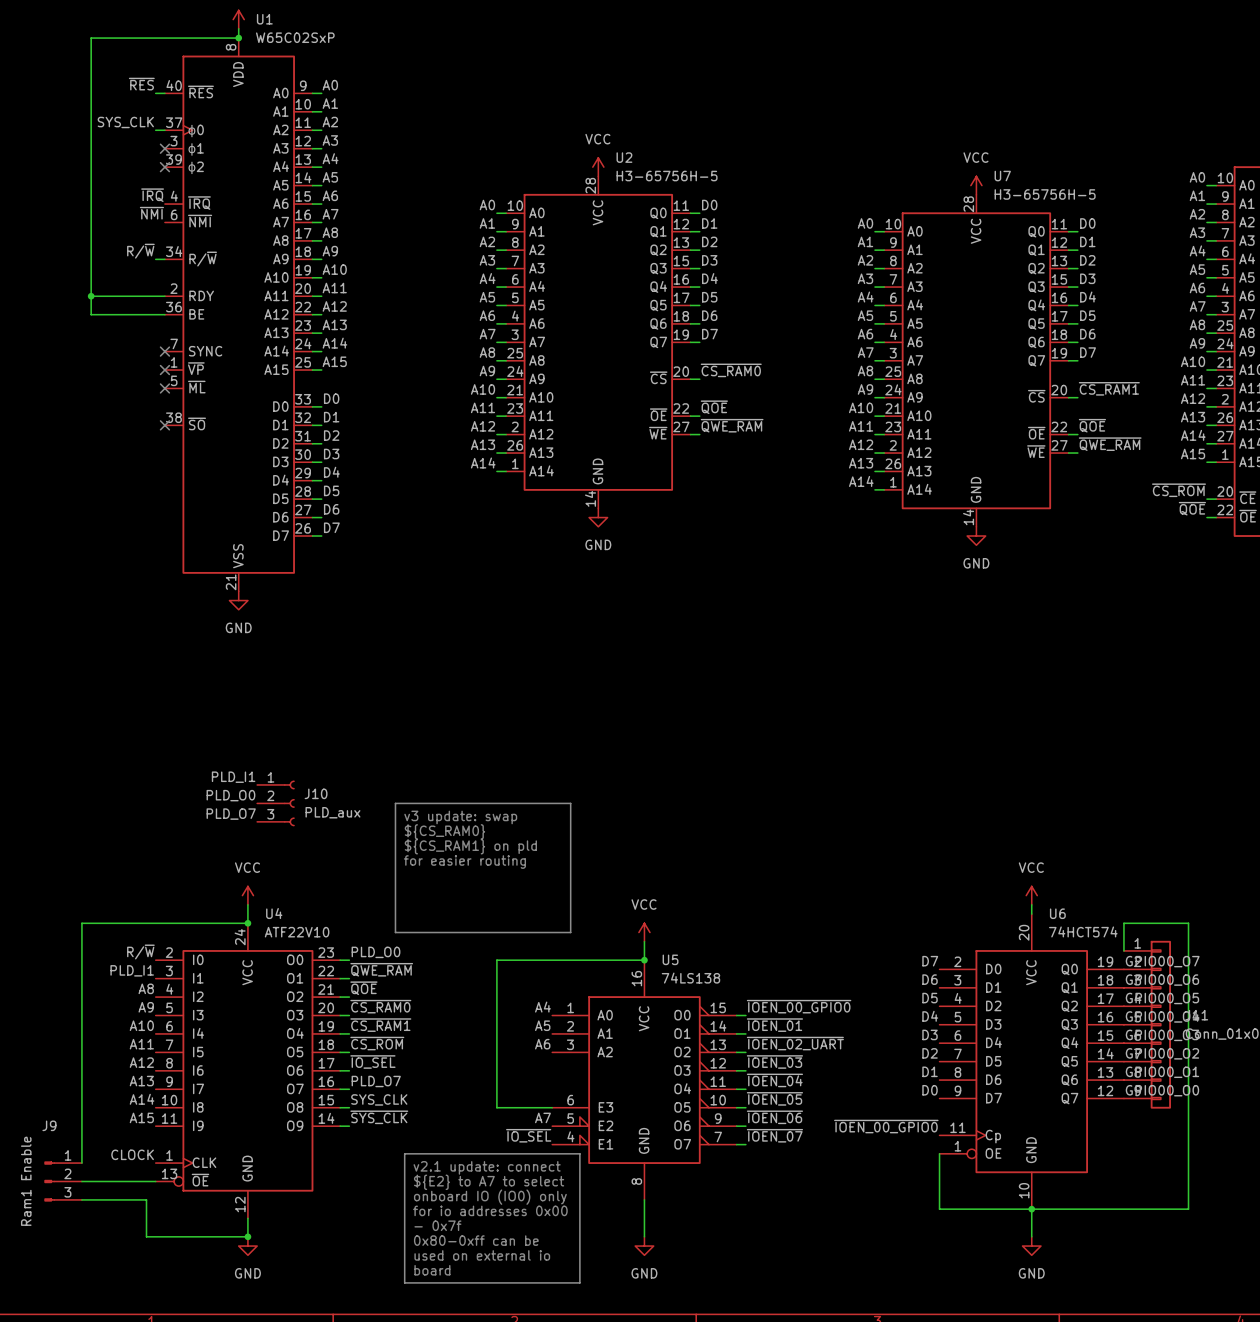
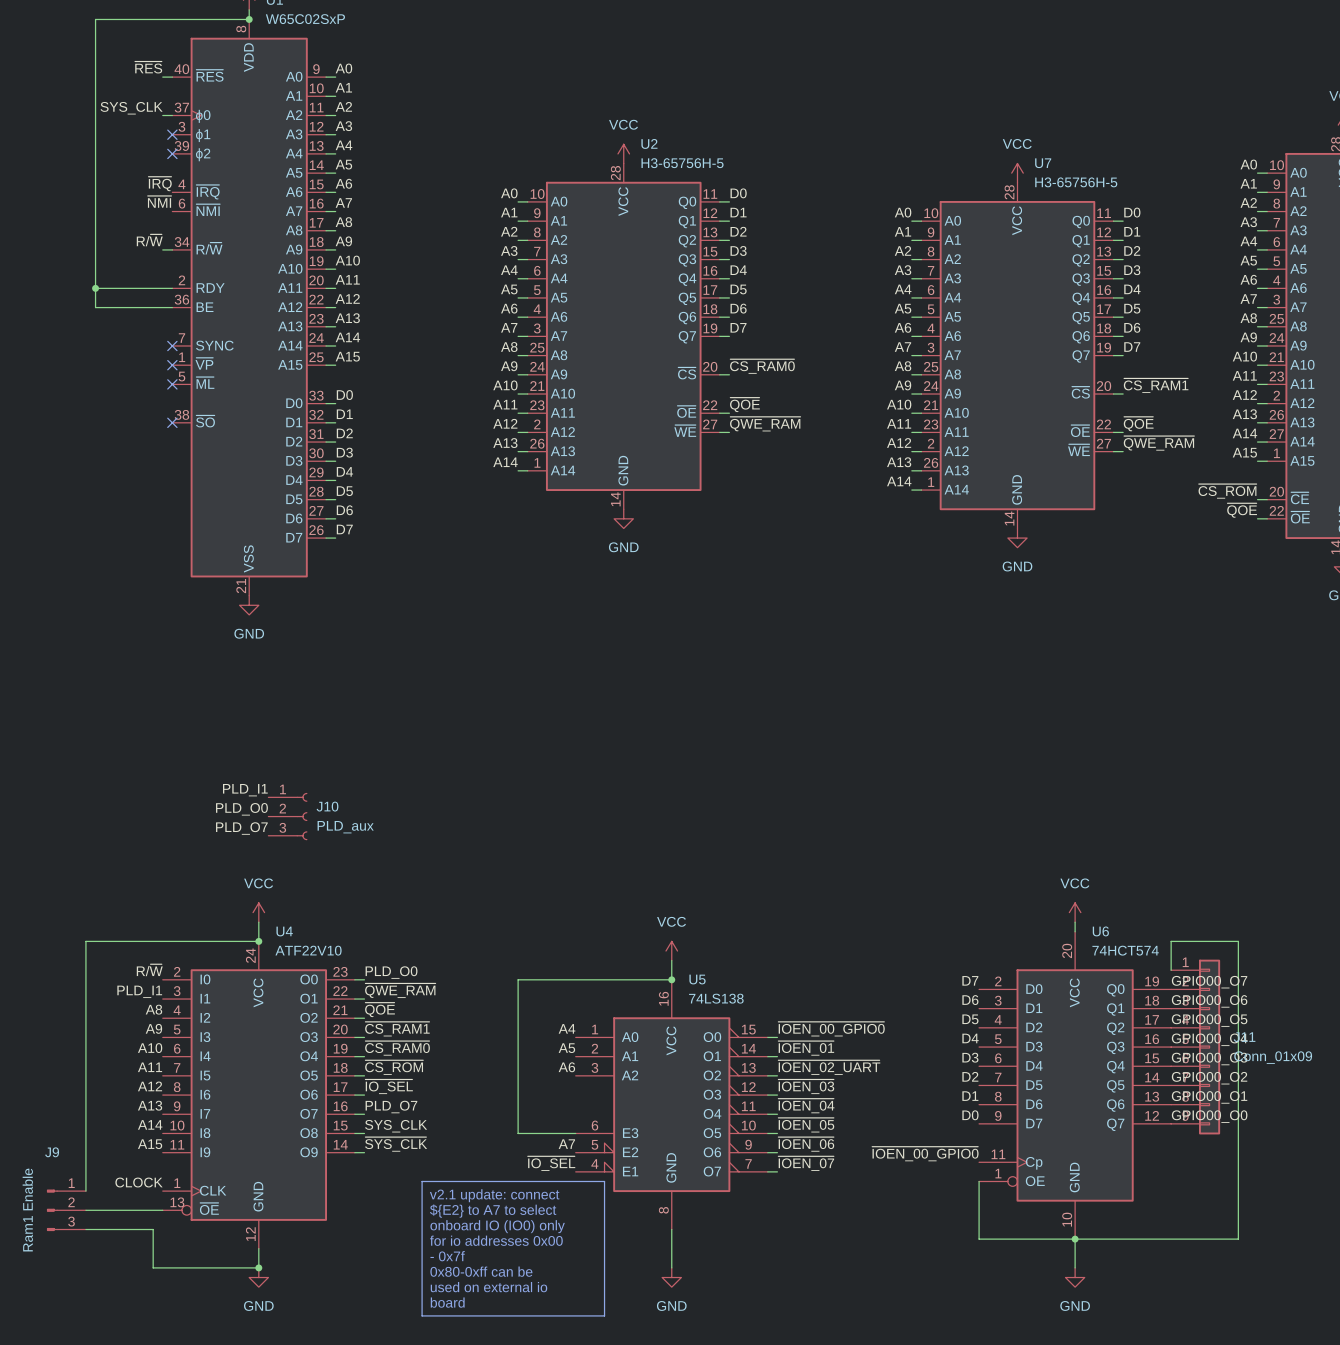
line: (395, 803) (570, 803) (570, 932) (395, 932) (395, 803) -> none
text: v3 update: swap (460, 817) -> none
text: ${CS_RAM0} (444, 831) -> none
text: ${CS_RAM1} on pld (470, 846) -> none
text: for easier routing (464, 862) -> none
label: ~{CS_RAM0} (380, 1006) -> ~{CS_RAM1} (397, 1029)
label: ~{CS_RAM1} (380, 1025) -> ~{CS_RAM0} (397, 1048)

